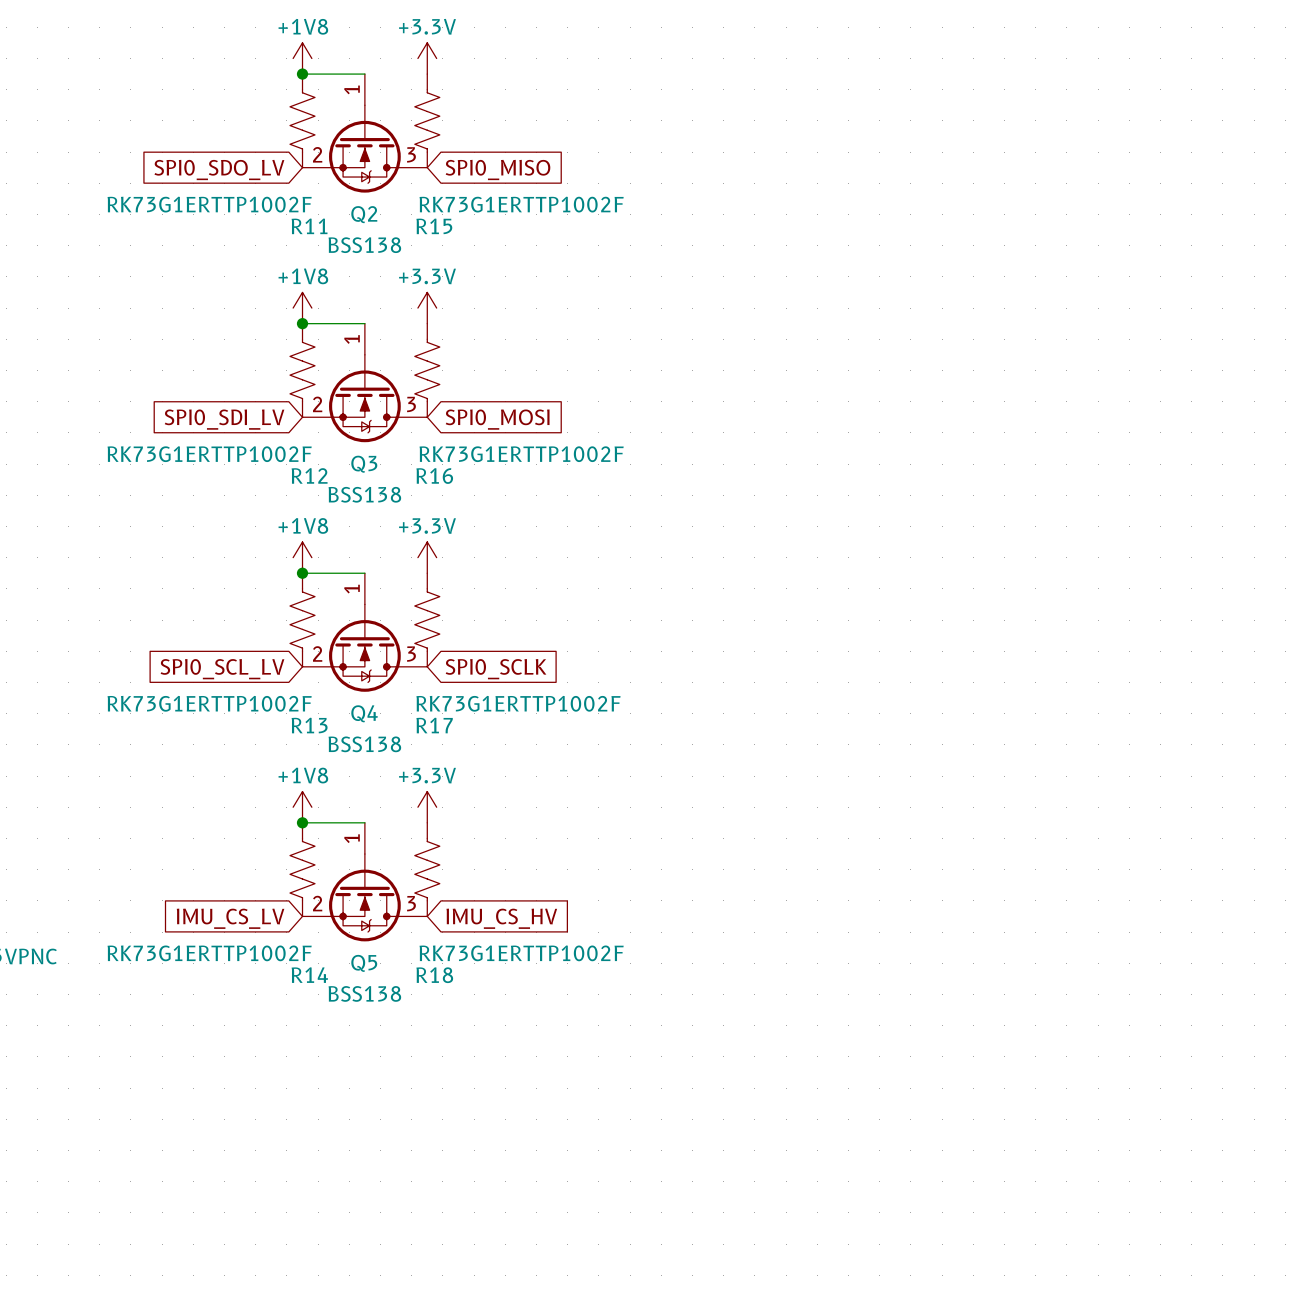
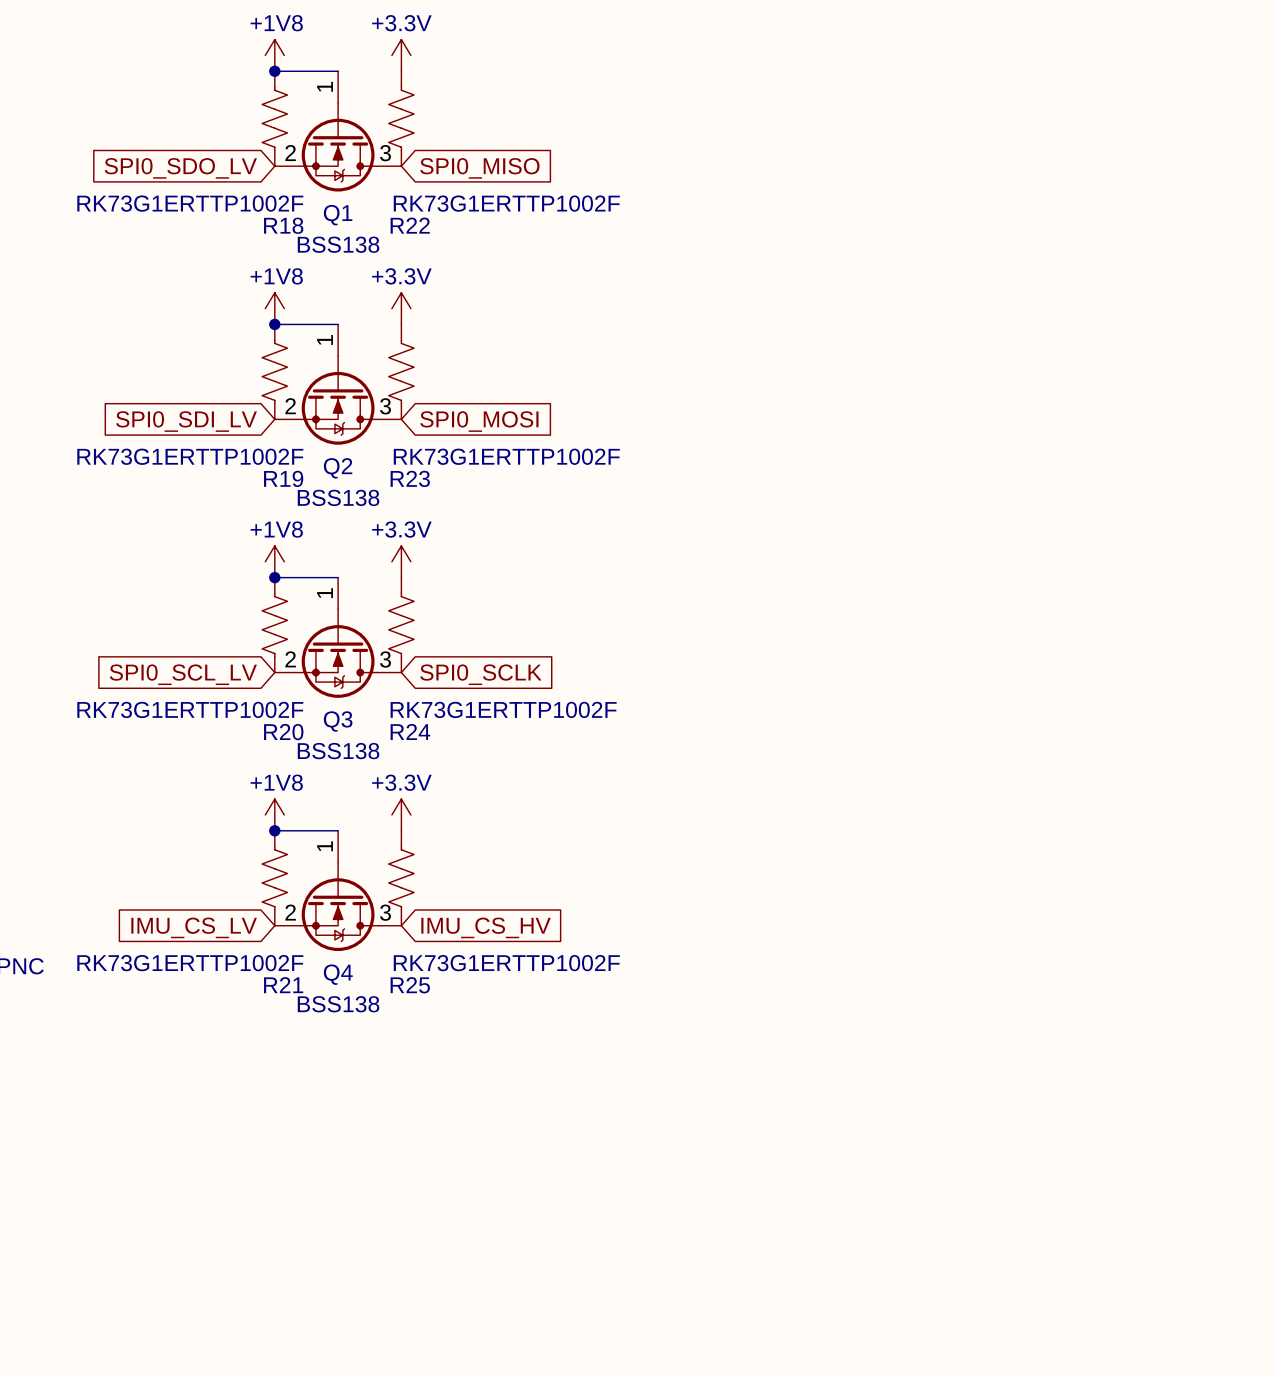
Q2 name: Q2 (364, 214) -> Q1 (338, 215)
R11 name: R11 (309, 226) -> R18 (283, 225)
R15 name: R15 (434, 226) -> R22 (410, 225)
Q3 name: Q3 (364, 464) -> Q2 (338, 468)
R12 name: R12 (309, 475) -> R19 (283, 478)
R16 name: R16 (434, 476) -> R23 (410, 478)
Q4 name: Q4 (364, 713) -> Q3 (338, 721)
R13 name: R13 (309, 725) -> R20 (283, 732)
R17 name: R17 (434, 725) -> R24 (410, 731)
Q5 name: Q5 (364, 963) -> Q4 (338, 974)
R14 name: R14 (309, 975) -> R21 (283, 985)
R18 name: R18 (434, 975) -> R25 (410, 985)

